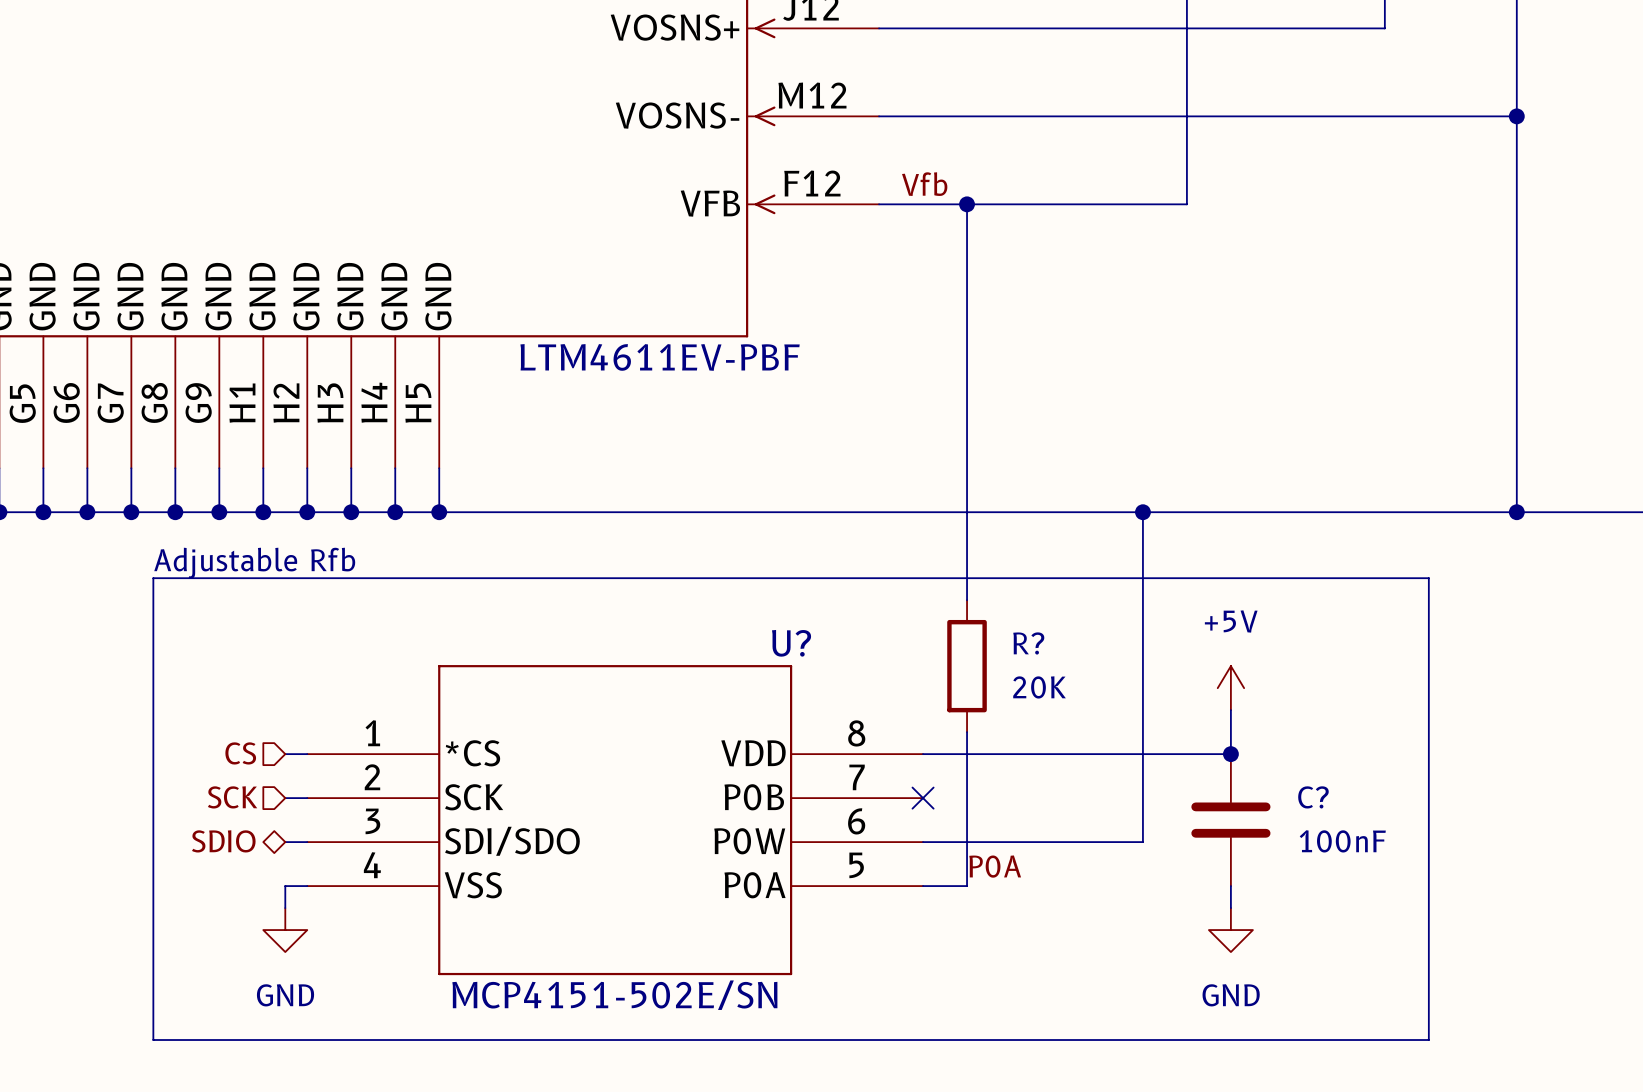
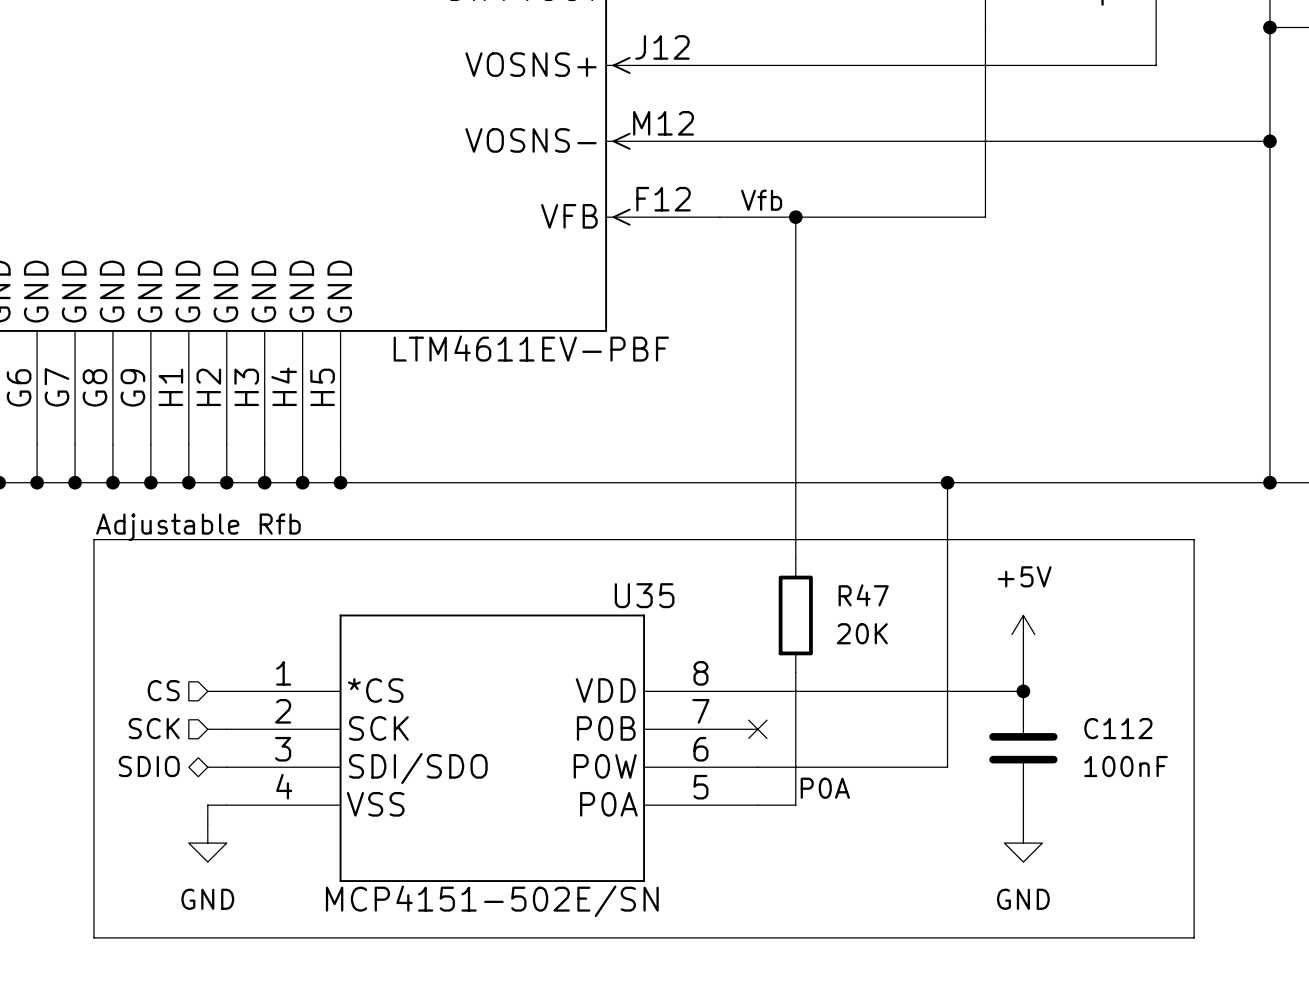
U? name: U? (791, 643) -> U35 (644, 595)
R? name: R? (1028, 643) -> R47 (863, 595)
C? name: C? (1313, 797) -> C112 (1118, 728)

